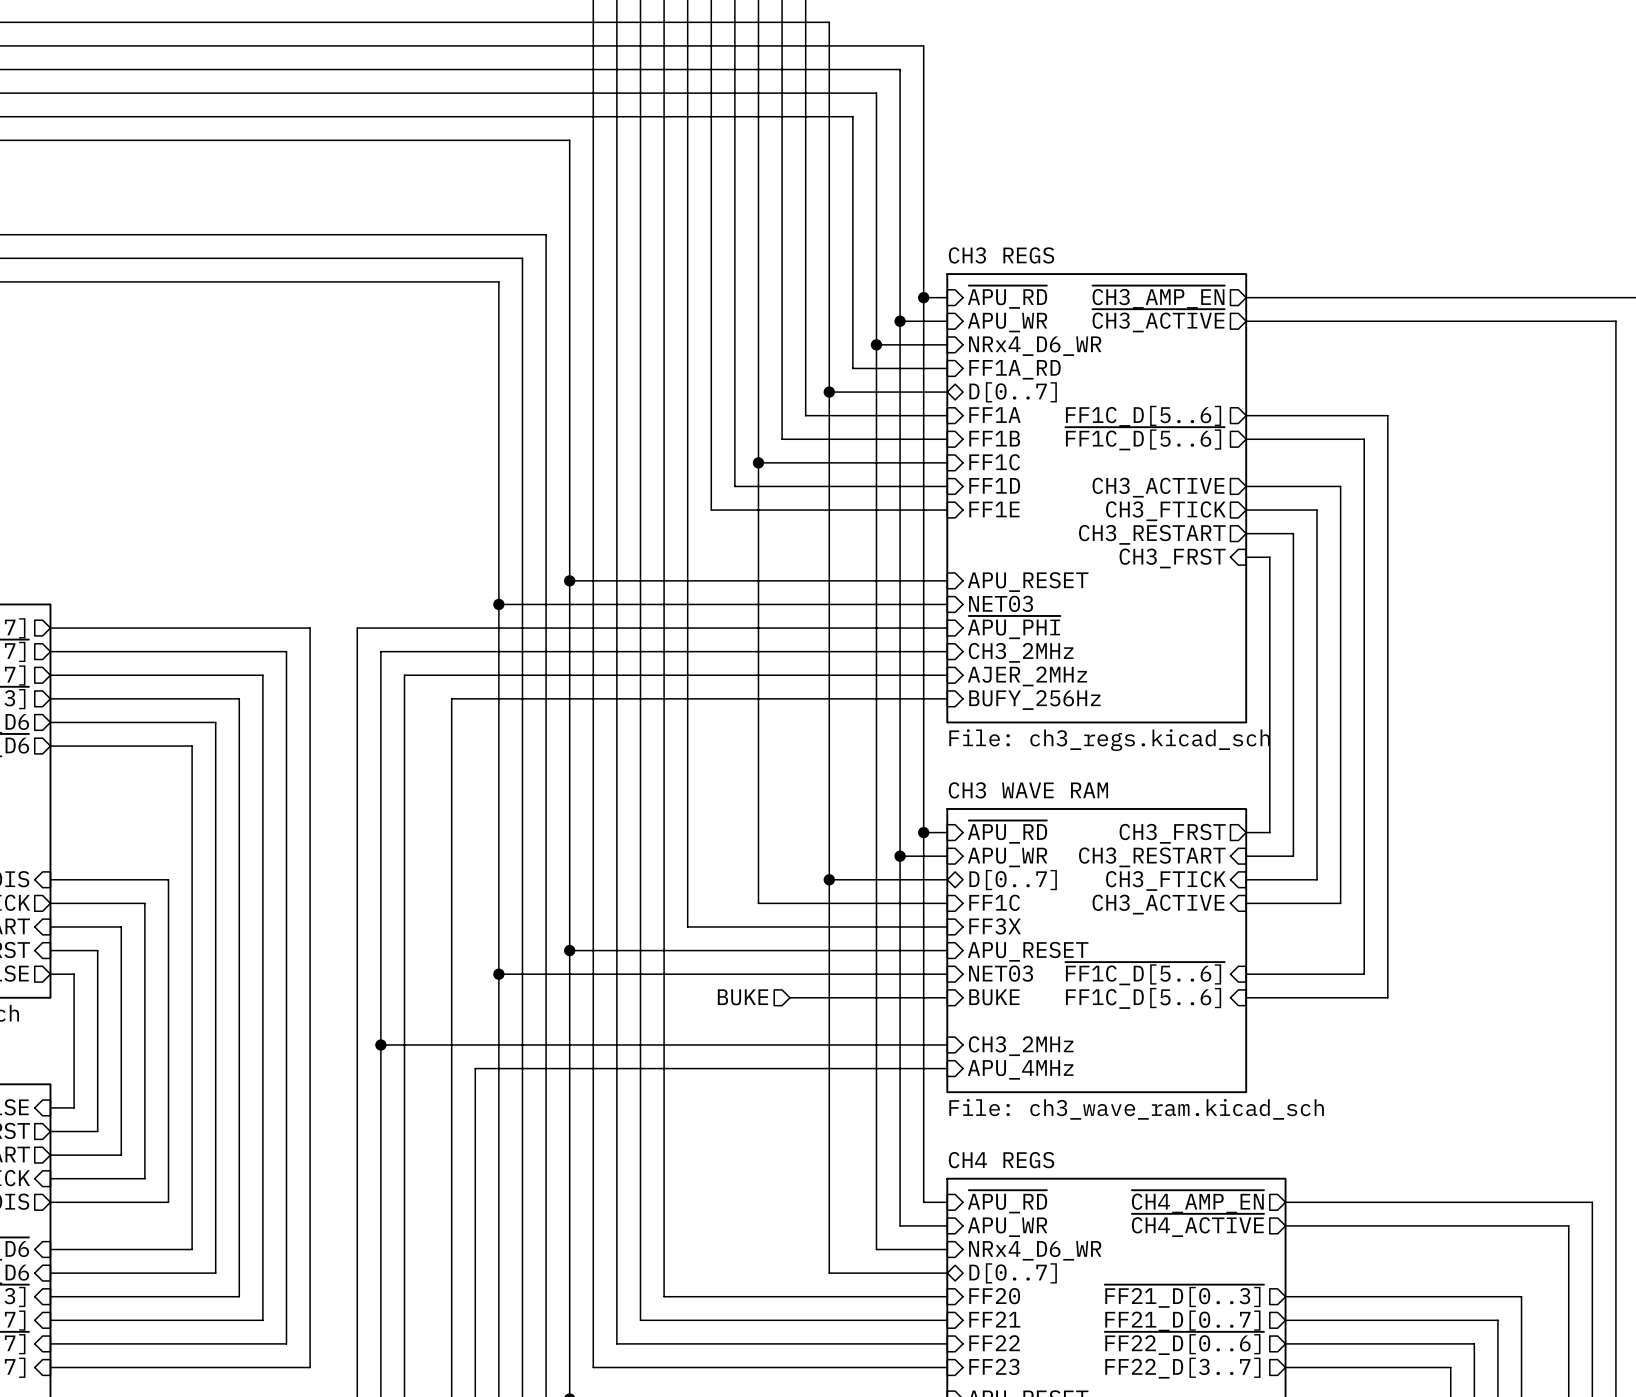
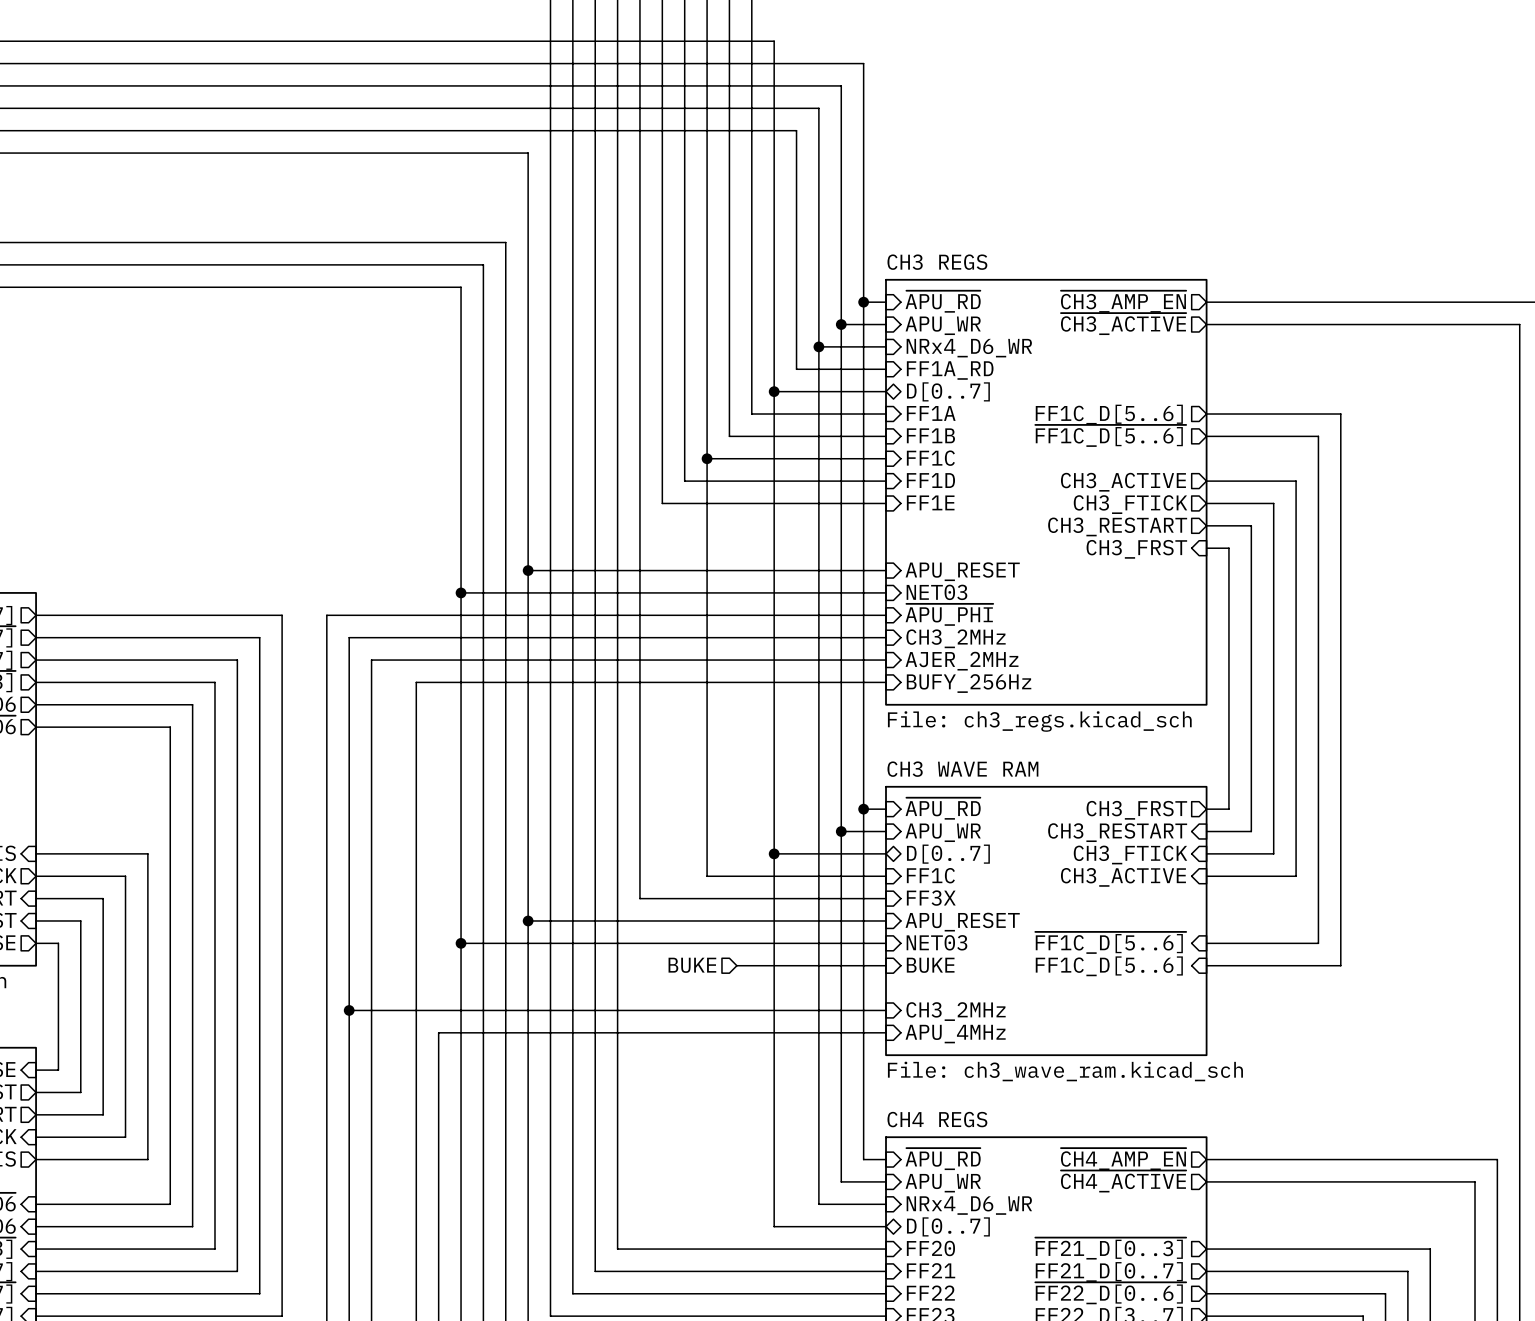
sheet CH3 REGS shape: [946, 273, 1248, 724] -> [885, 278, 1208, 706]
sheet pin position: ~{CH3_AMP_EN} (1158, 297) -> ~{CH3_AMP_EN} (1123, 301)
wire: (1246, 297) (1285, 297) -> none
sheet pin position: ~{CH3_ACTIVE} (1158, 320) -> ~{CH3_ACTIVE} (1123, 324)
wire: (1246, 321) (1285, 321) -> none
bus: (1246, 415) (1285, 415) -> none
bus: (1387, 415) (1387, 997) -> (1303, 414) (1340, 414) (1340, 965) (1303, 965)
sheet pin position: FF1C_D[5..6] (1143, 416) -> FF1C_D[5..6] (1109, 414)
sheet pin position: ~{FF1C_D[5..6]} (1145, 438) -> ~{FF1C_D[5..6]} (1110, 435)
bus: (1246, 439) (1285, 439) -> none
bus: (1364, 439) (1364, 974) -> (1281, 436) (1318, 436) (1318, 943) (1281, 943)
wire: (1246, 486) (1285, 486) -> none
wire: (1340, 486) (1340, 903) -> (1258, 481) (1296, 481) (1296, 876) (1258, 876)
sheet pin position: CH3_ACTIVE (1158, 487) -> CH3_ACTIVE (1123, 482)
wire: (1246, 510) (1285, 510) -> none
wire: (1317, 510) (1317, 879) -> (1236, 503) (1273, 503) (1273, 853) (1236, 853)
sheet pin position: CH3_FTICK (1165, 511) -> CH3_FTICK (1130, 504)
wire: (1246, 533) (1285, 533) -> none
wire: (1293, 533) (1293, 856) -> (1214, 525) (1251, 525) (1251, 831) (1214, 831)
sheet pin position: CH3_RESTART (1152, 534) -> CH3_RESTART (1117, 526)
wire: (1246, 557) (1269, 557) (1269, 832) (1246, 832) -> (1206, 548) (1228, 548) (1228, 809) (1206, 809)
sheet pin position: CH3_FRST (1172, 558) -> CH3_FRST (1136, 549)
sheet CH3 WAVE RAM shape: [946, 808, 1248, 1094] -> [885, 785, 1208, 1057]
sheet pin position: CH3_FRST (1172, 833) -> CH3_FRST (1136, 810)
wire: (1246, 856) (1285, 856) -> none
sheet pin position: CH3_RESTART (1152, 857) -> CH3_RESTART (1117, 832)
wire: (1246, 879) (1285, 879) -> none
sheet pin position: CH3_FTICK (1165, 880) -> CH3_FTICK (1130, 855)
wire: (1246, 903) (1285, 903) -> none
sheet pin position: CH3_ACTIVE (1158, 904) -> CH3_ACTIVE (1123, 877)
sheet pin position: ~{FF1C_D[5..6]} (1145, 973) -> ~{FF1C_D[5..6]} (1110, 942)
bus: (1246, 974) (1285, 974) -> none
bus: (1246, 997) (1285, 997) -> none
sheet pin position: FF1C_D[5..6] (1143, 998) -> FF1C_D[5..6] (1109, 966)

